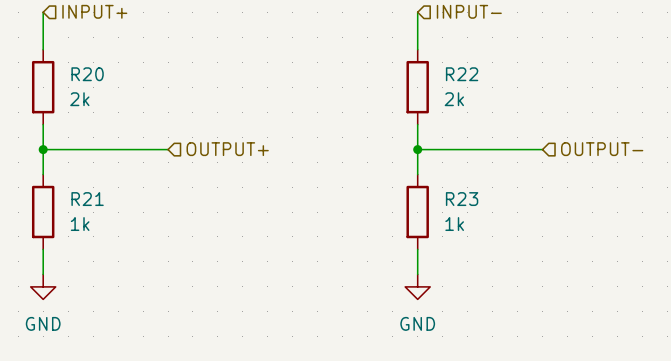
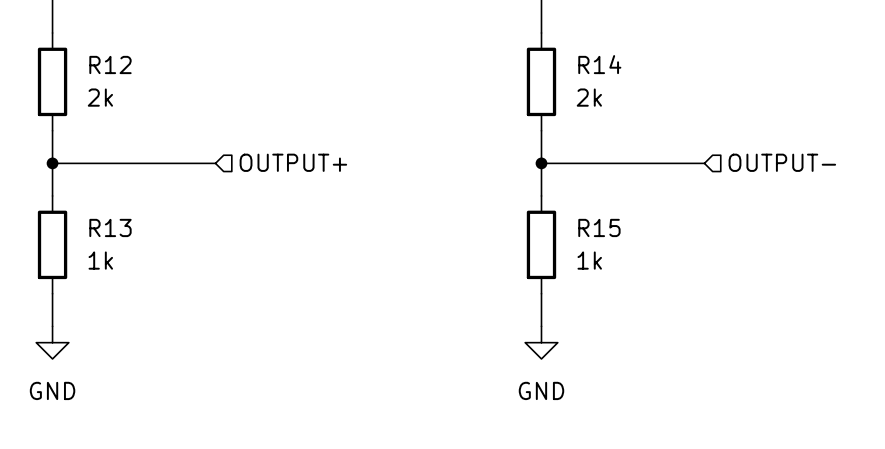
R20 name: R20 (87, 74) -> R12 (110, 64)
R22 name: R22 (462, 74) -> R14 (599, 64)
R21 name: R21 (87, 199) -> R13 (110, 227)
R23 name: R23 (462, 199) -> R15 (599, 227)

